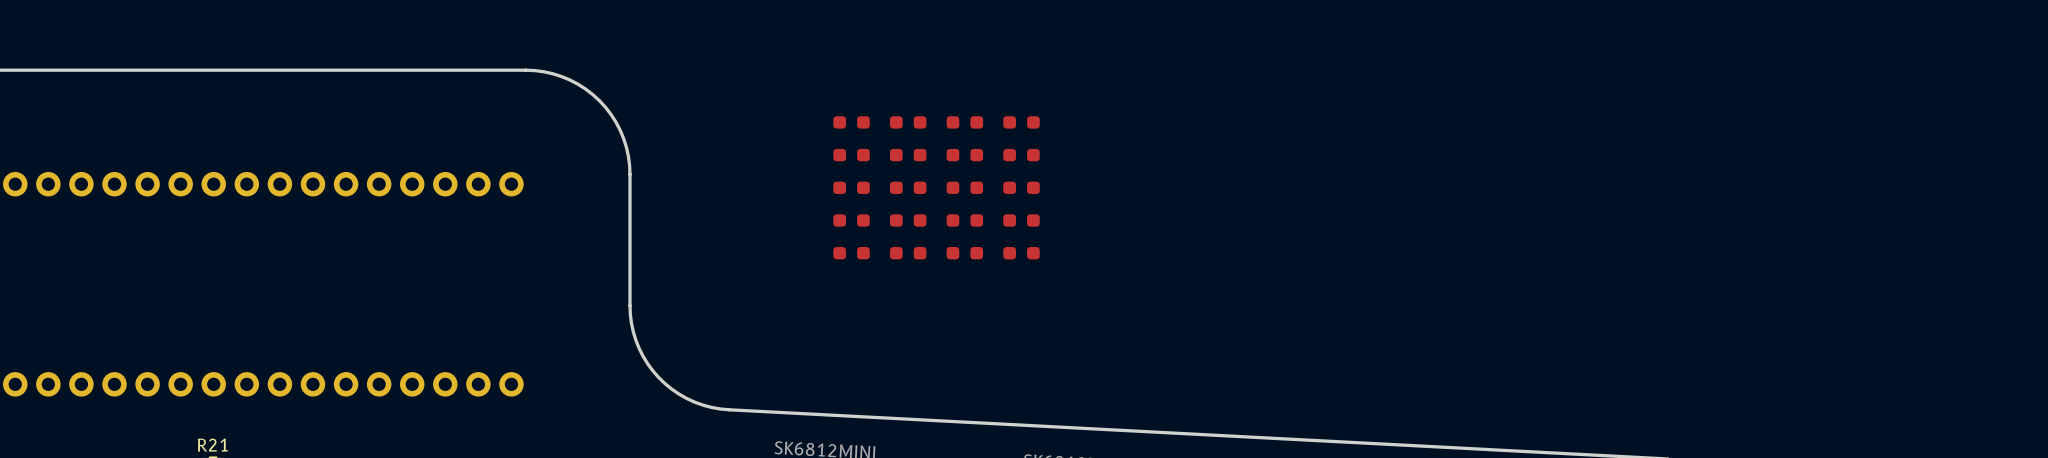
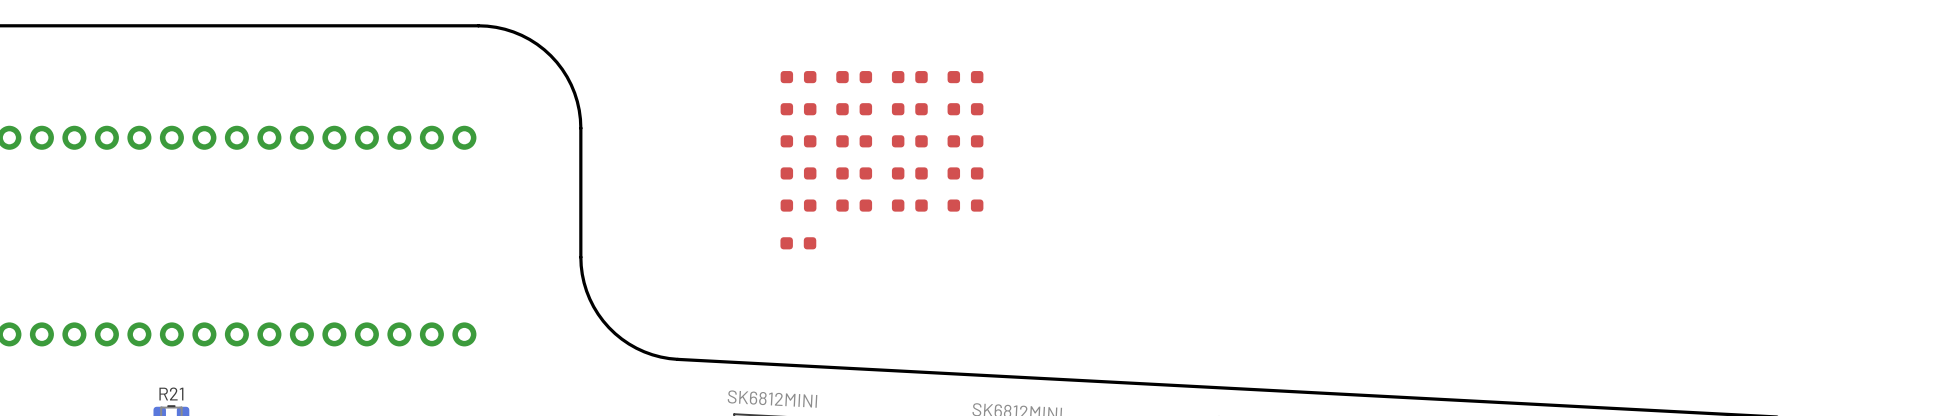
part: none -> (798, 243)

